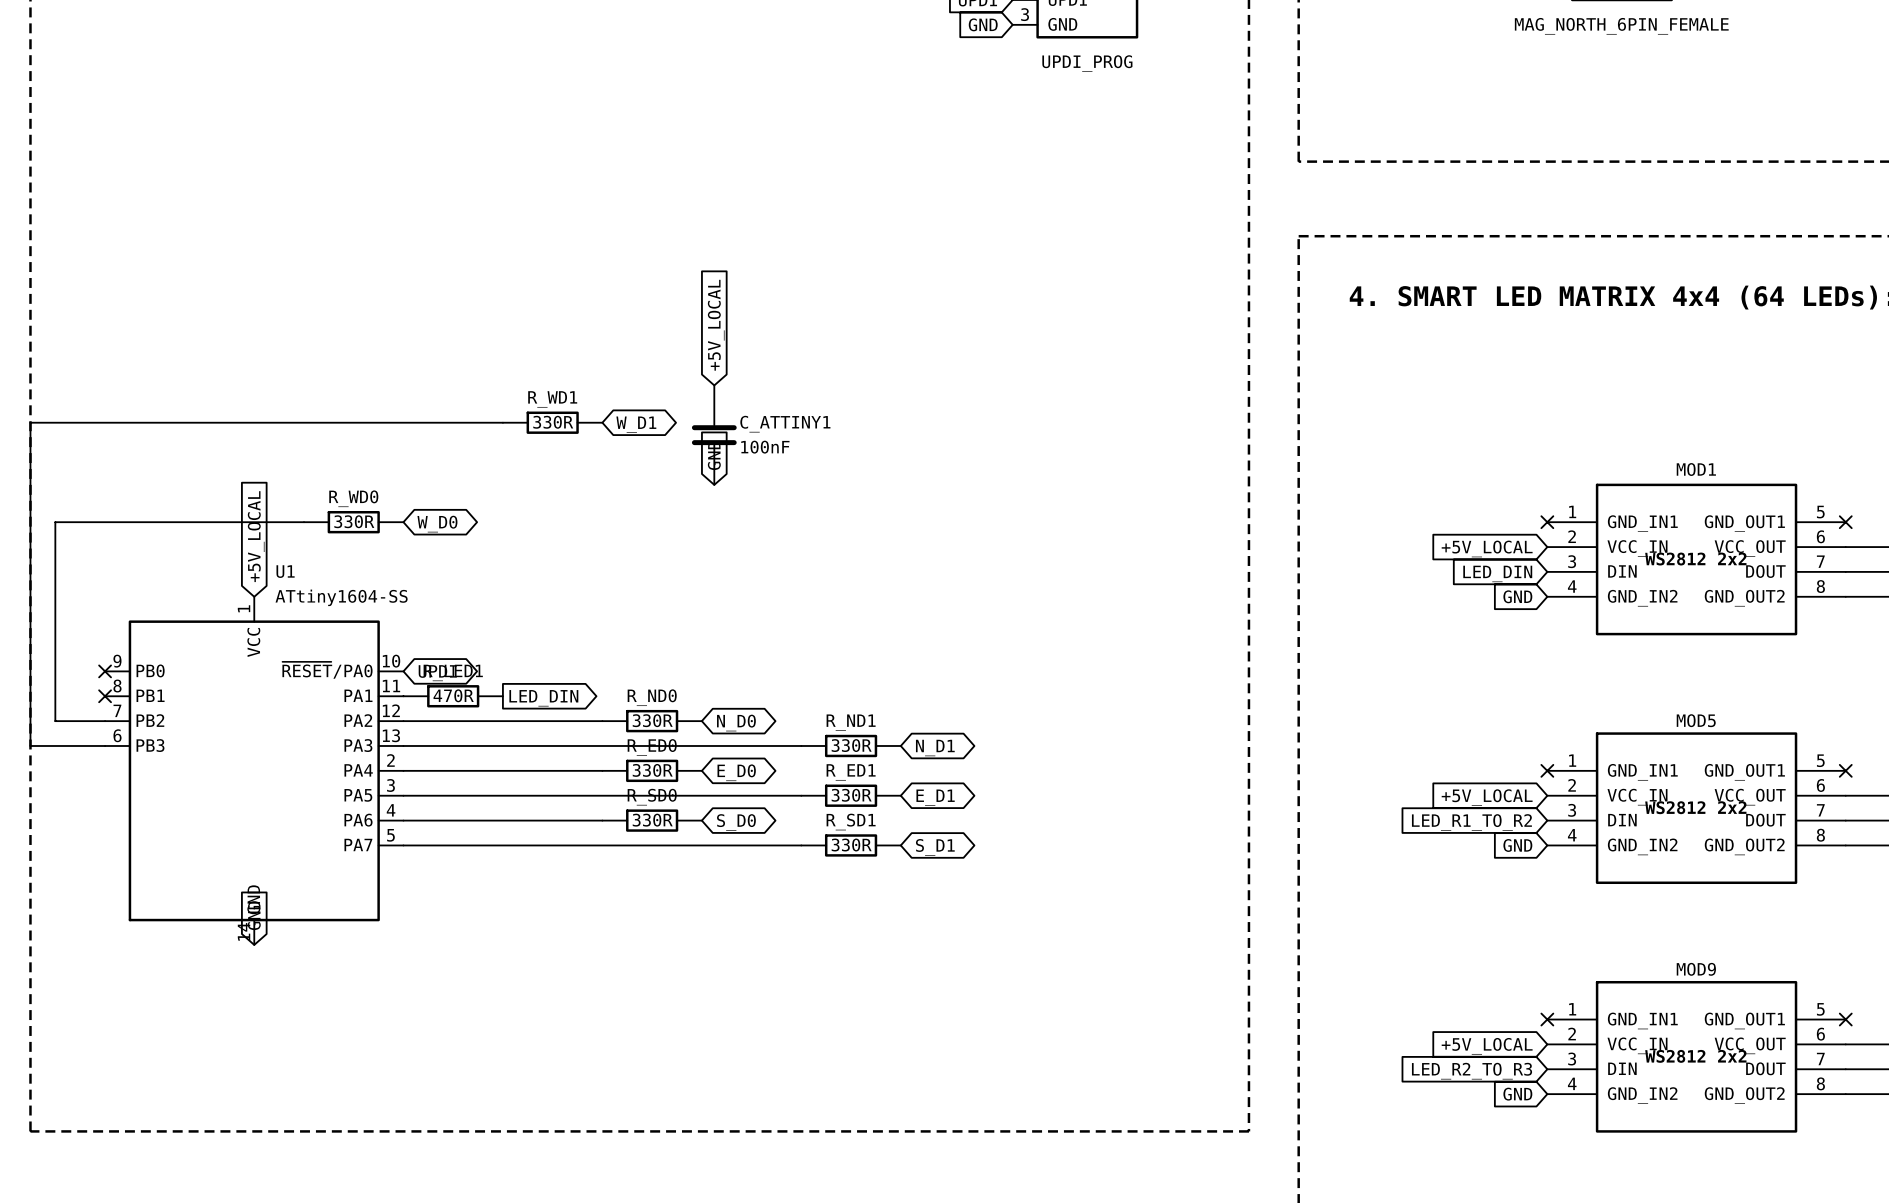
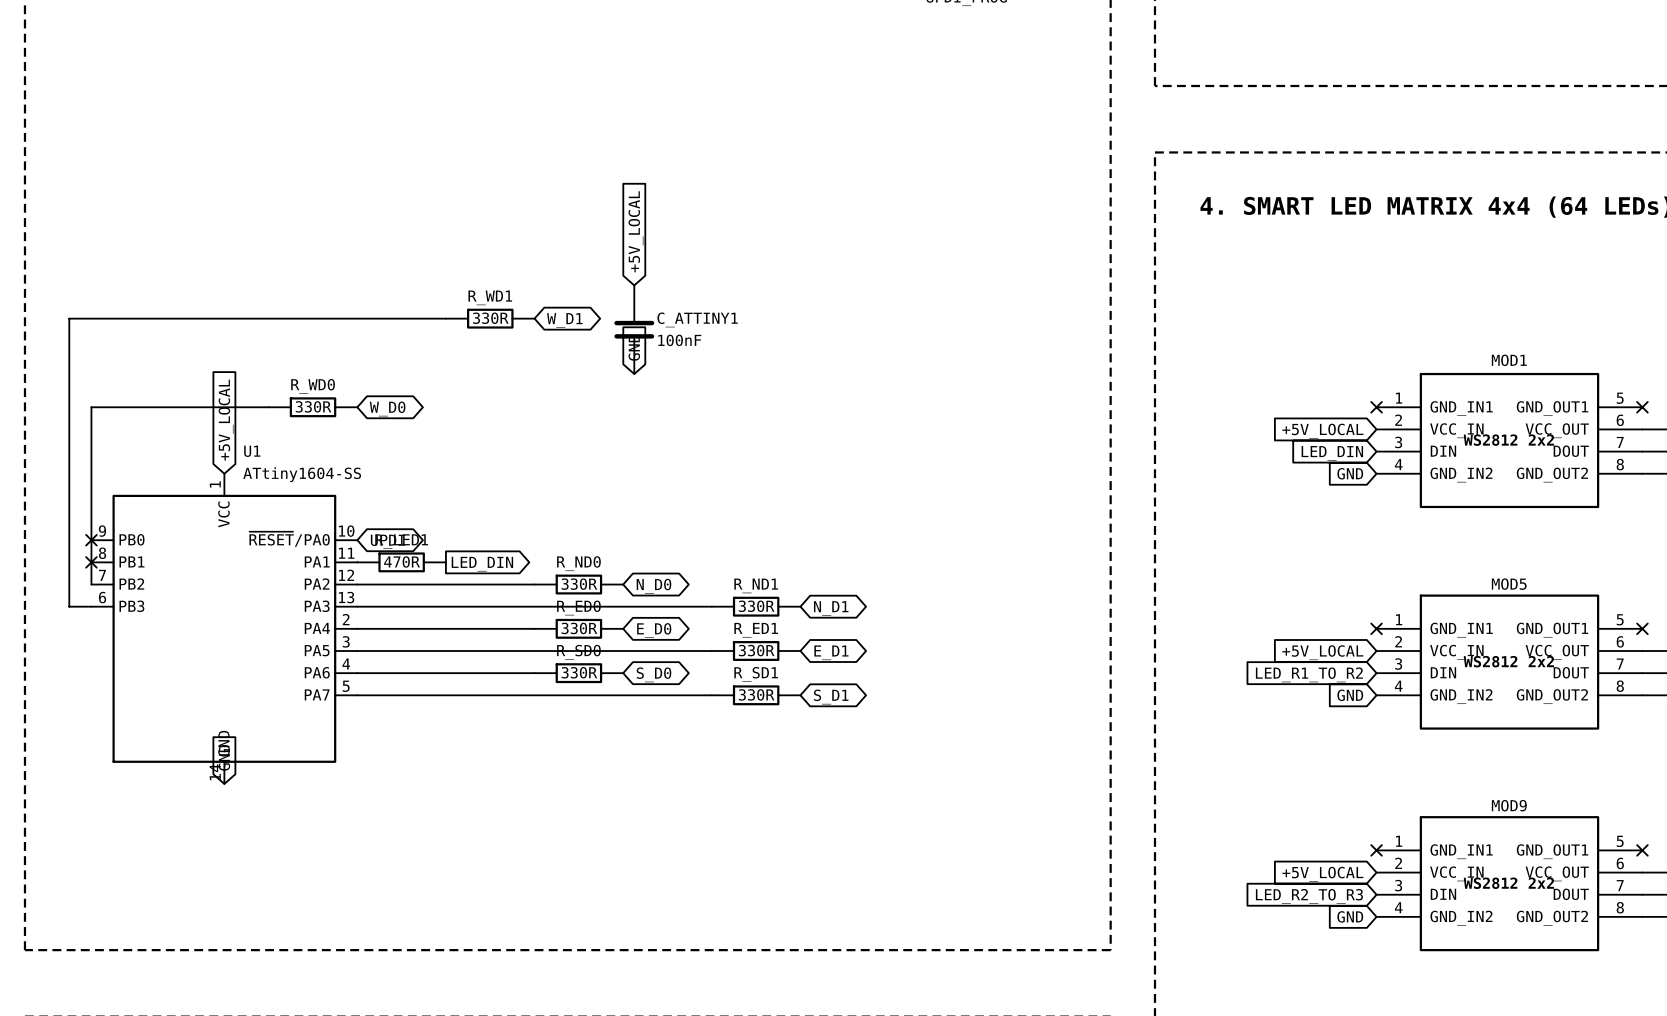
wire: (80, 422) (30, 422) (30, 745) (80, 745) -> (69, 318) (69, 606)
wire: (105, 522) (55, 522) (55, 721) (105, 721) -> (91, 407) (91, 584)

